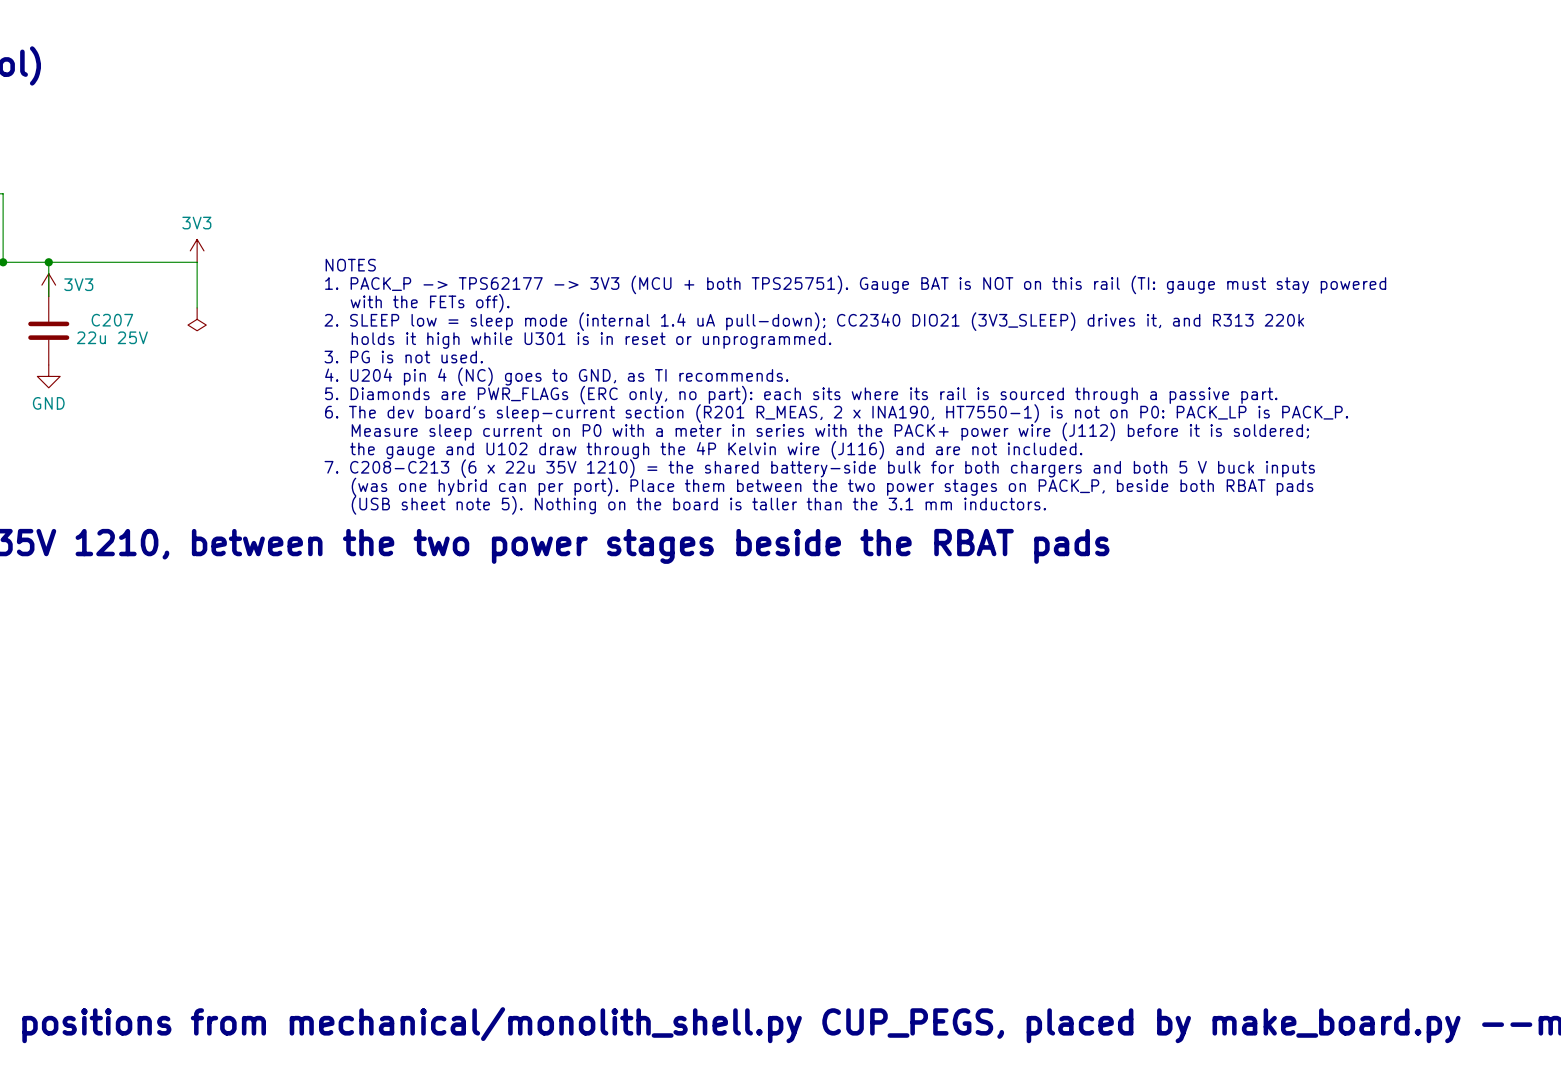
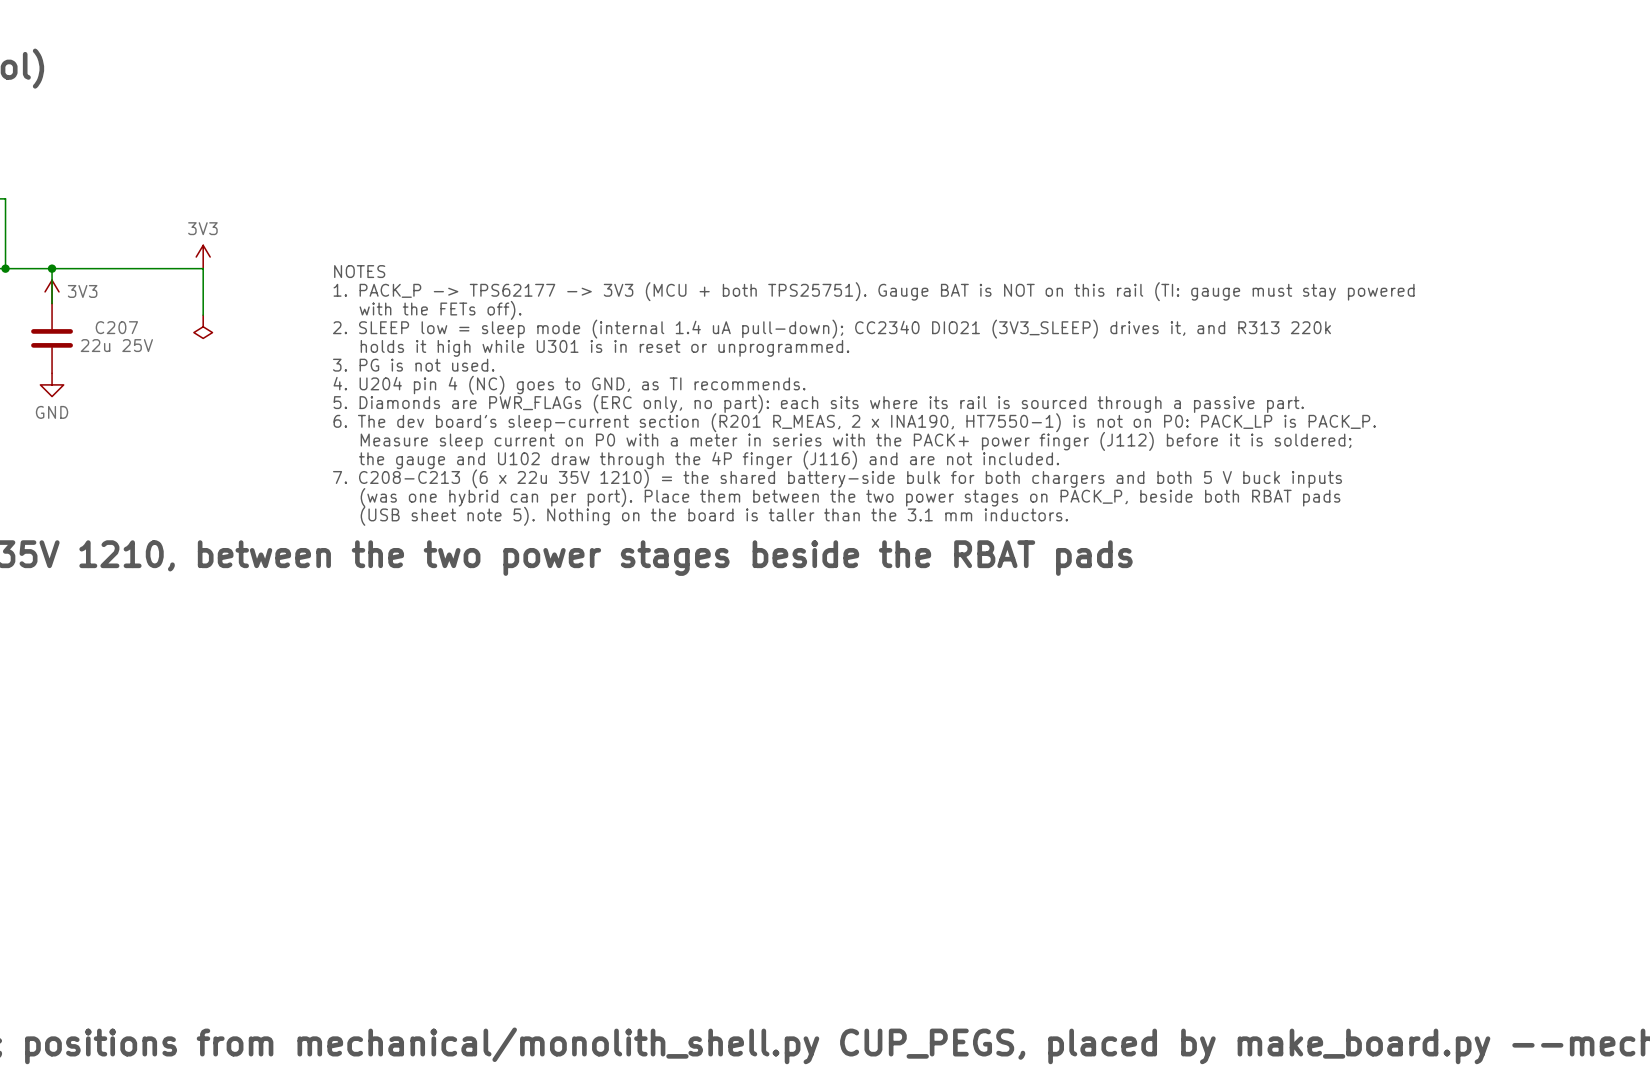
text: Measure sleep current on P0 with a meter in series with the PACK+ power wire (J112) before it is soldered; (830, 431) -> Measure sleep current on P0 with a meter in series with the PACK+ power finger (J112) before it is soldered; (856, 441)
text: the gauge and U102 draw through the 4P Kelvin wire (J116) and are not included. (716, 450) -> the gauge and U102 draw through the 4P finger (J116) and are not included. (709, 460)

